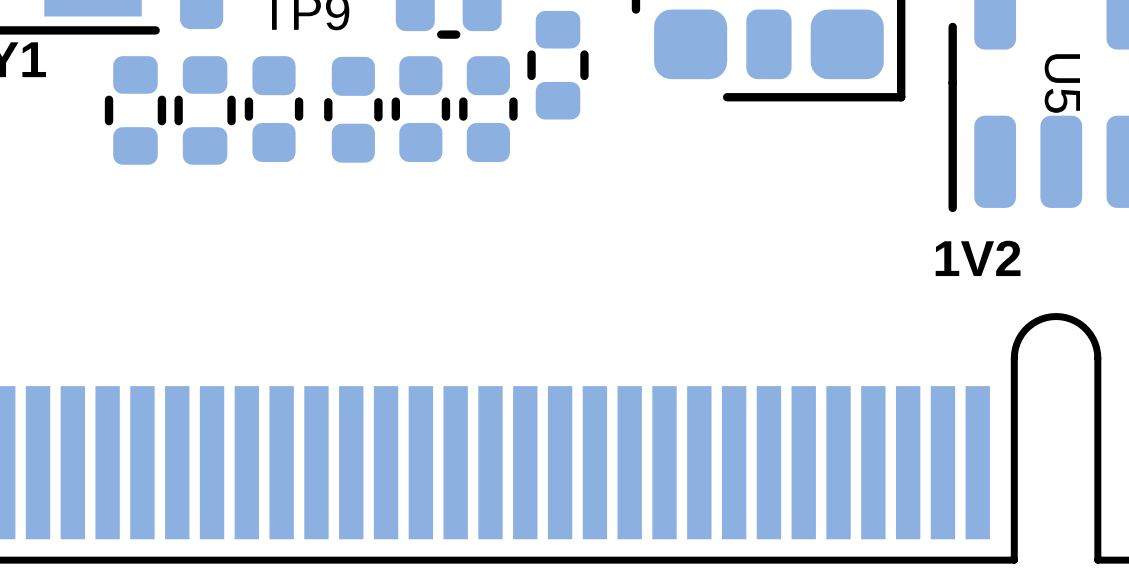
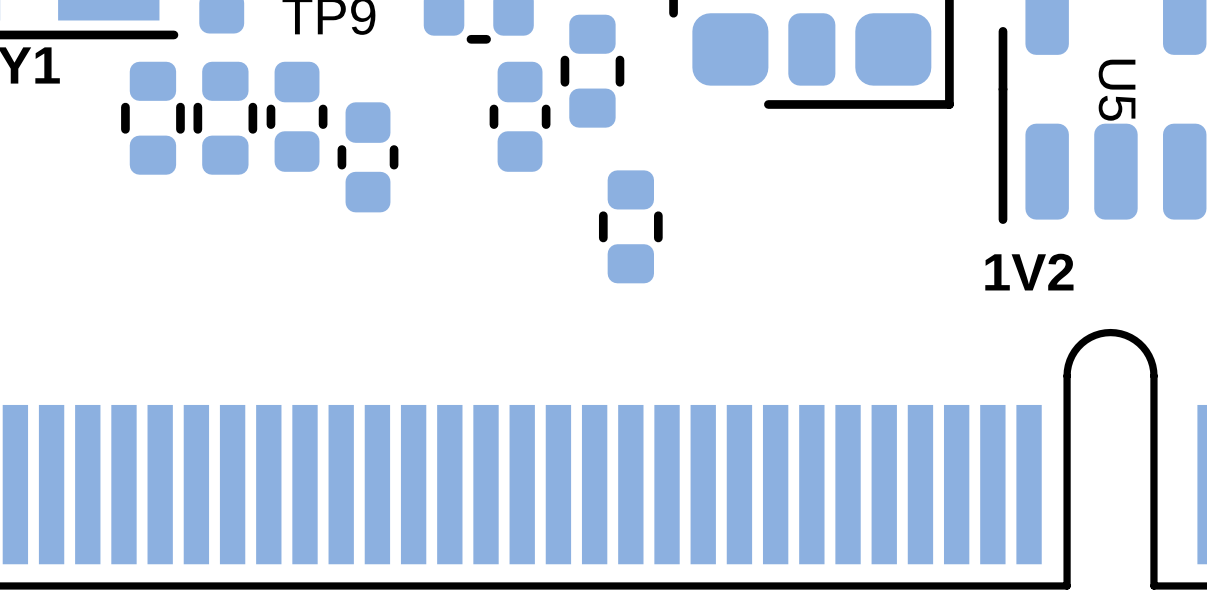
part position: (353, 109) -> (367, 157)
part: (420, 109) -> none
part: none -> (630, 226)

